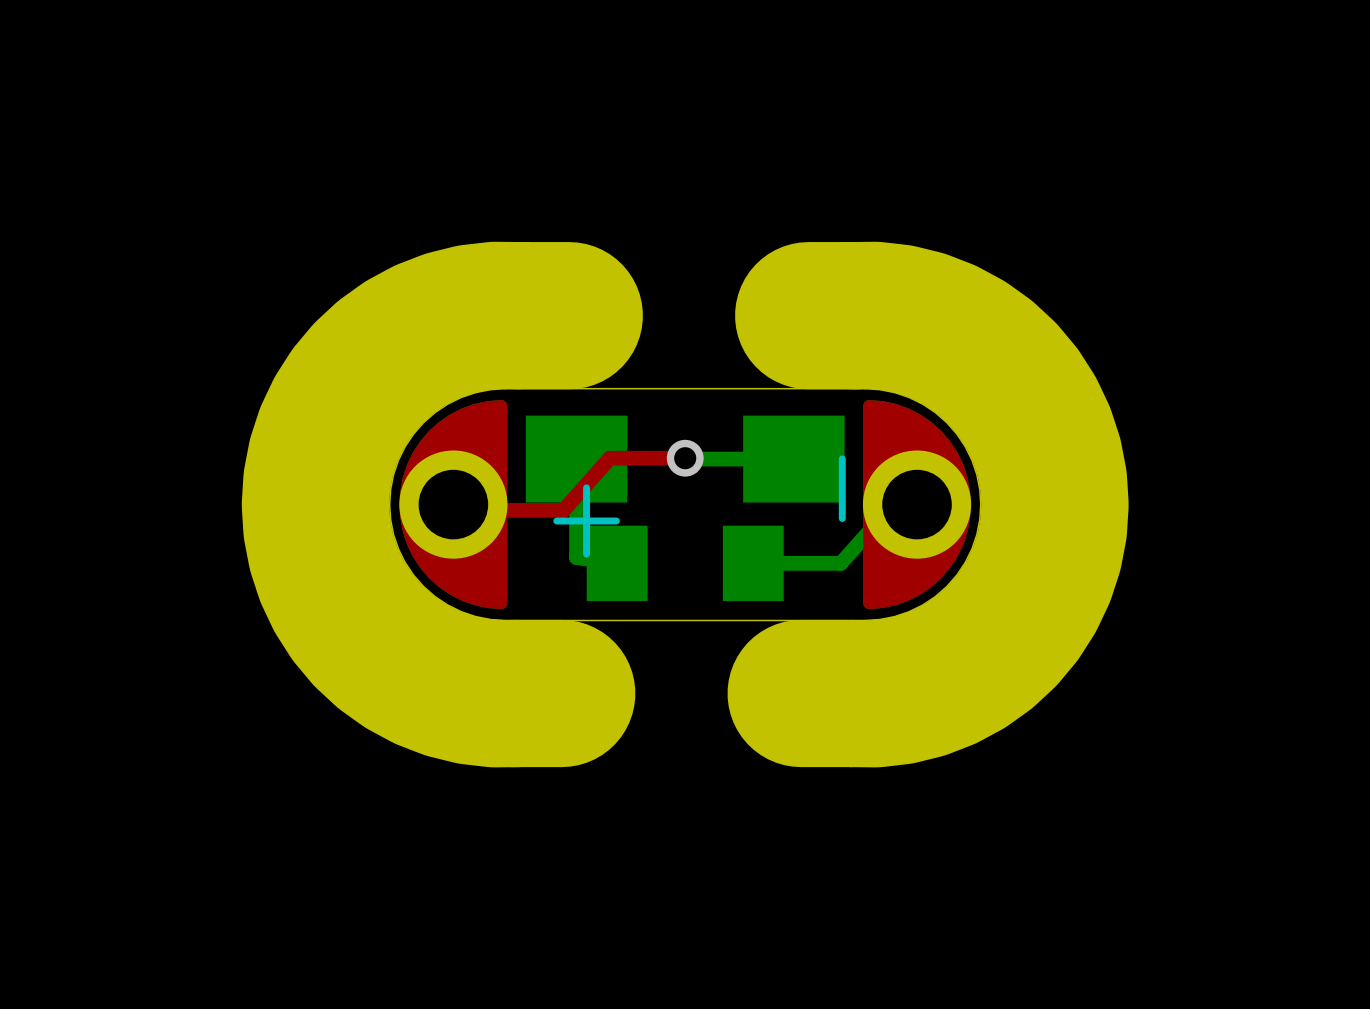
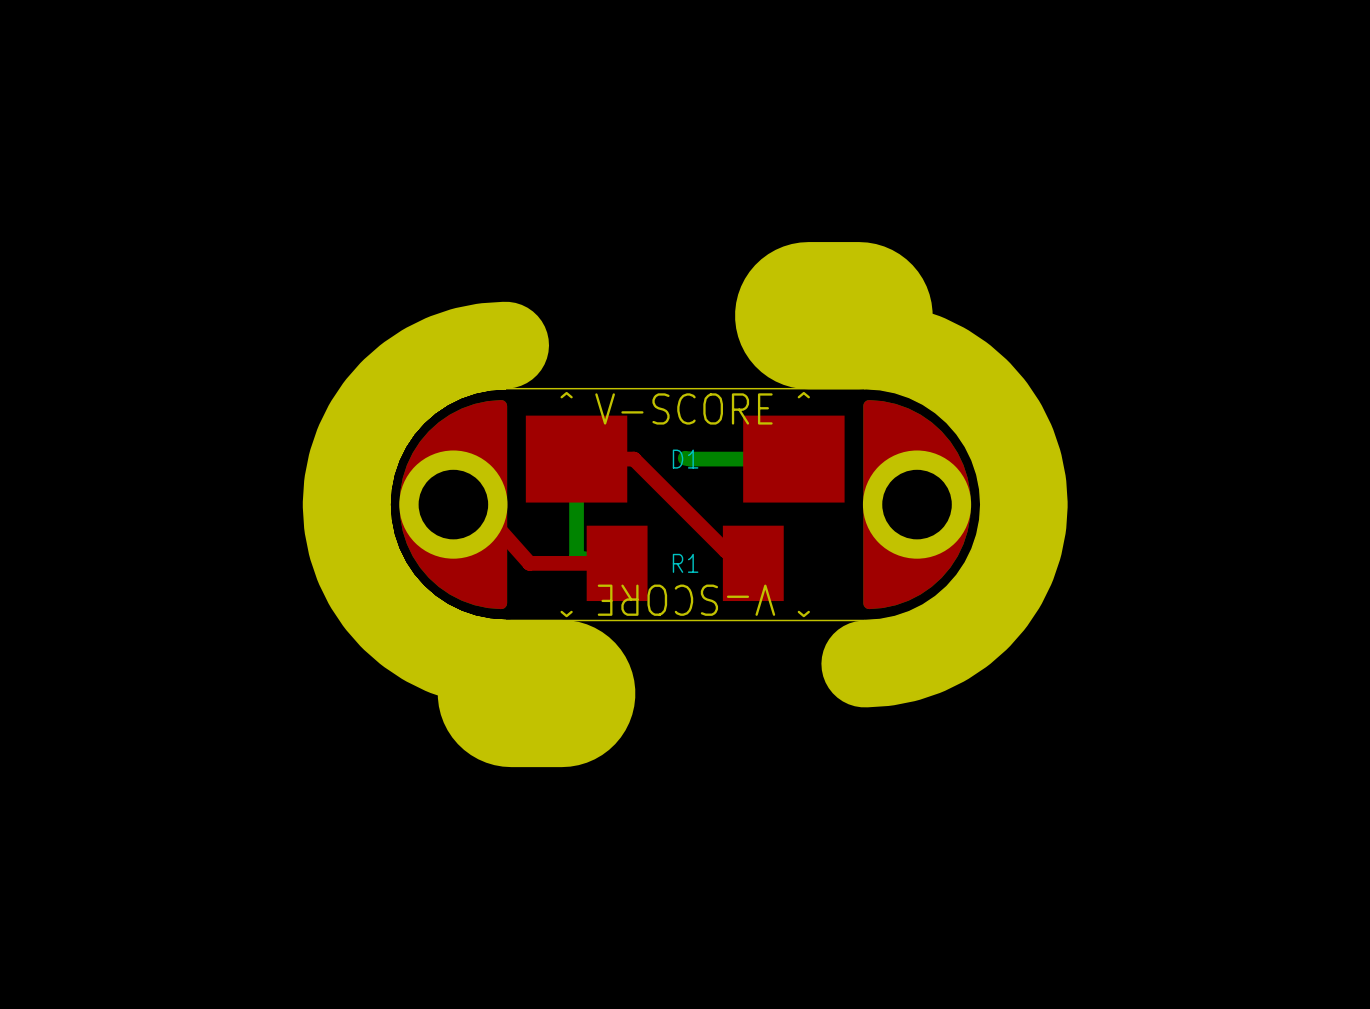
board edge: (569, 315) (494, 315) (471, 318) (447, 323) (425, 332) (404, 343) (384, 357) (367, 374) (352, 392) (339, 412) (328, 434) (321, 457) (316, 480) (315, 504) (316, 528) (321, 552) (328, 574) (339, 596) (352, 616) (367, 634) (384, 651) (404, 665) (425, 676) (447, 685) (471, 691) (494, 693) (518, 693) -> none
board edge: (851, 315) (875, 315) (899, 318) (922, 323) (944, 332) (965, 343) (985, 357) (1003, 374) (1018, 392) (1031, 412) (1041, 434) (1049, 457) (1053, 480) (1055, 504) (1053, 528) (1049, 552) (1041, 574) (1031, 596) (1018, 616) (1003, 634) (985, 651) (965, 665) (944, 676) (922, 685) (899, 691) (875, 693) (801, 693) -> none
board edge: none -> (505, 345) (484, 346) (444, 357) (425, 366) (392, 391) (367, 424) (358, 443) (347, 483) (346, 504) (347, 525) (358, 565) (367, 584) (392, 617) (425, 642) (444, 651) (484, 662) (505, 663)
board edge: none -> (864, 345) (885, 346) (925, 357) (944, 366) (977, 391) (1002, 424) (1012, 443) (1022, 483) (1024, 504) (1022, 525) (1012, 565) (1002, 584) (977, 617) (944, 642) (925, 651) (885, 662) (864, 663)
text: none -> ^ V-SCORE ^ (685, 408)
top track: (685, 458) (609, 458) (563, 510) (482, 510) -> (617, 563) (529, 563) (482, 510)
via: (685, 458) -> none
top track: none -> (576, 459) (633, 459) (725, 550) (750, 551) (753, 563)
D1 side: bottom (685, 459) -> top (685, 459)
text: - (842, 488) -> none
bottom track: (917, 504) (911, 510) (888, 510) (840, 563) (753, 563) -> none
text: + (586, 520) -> none
R1 side: bottom (685, 563) -> top (685, 563)
text: none -> ^ V-SCORE ^ (685, 600)

